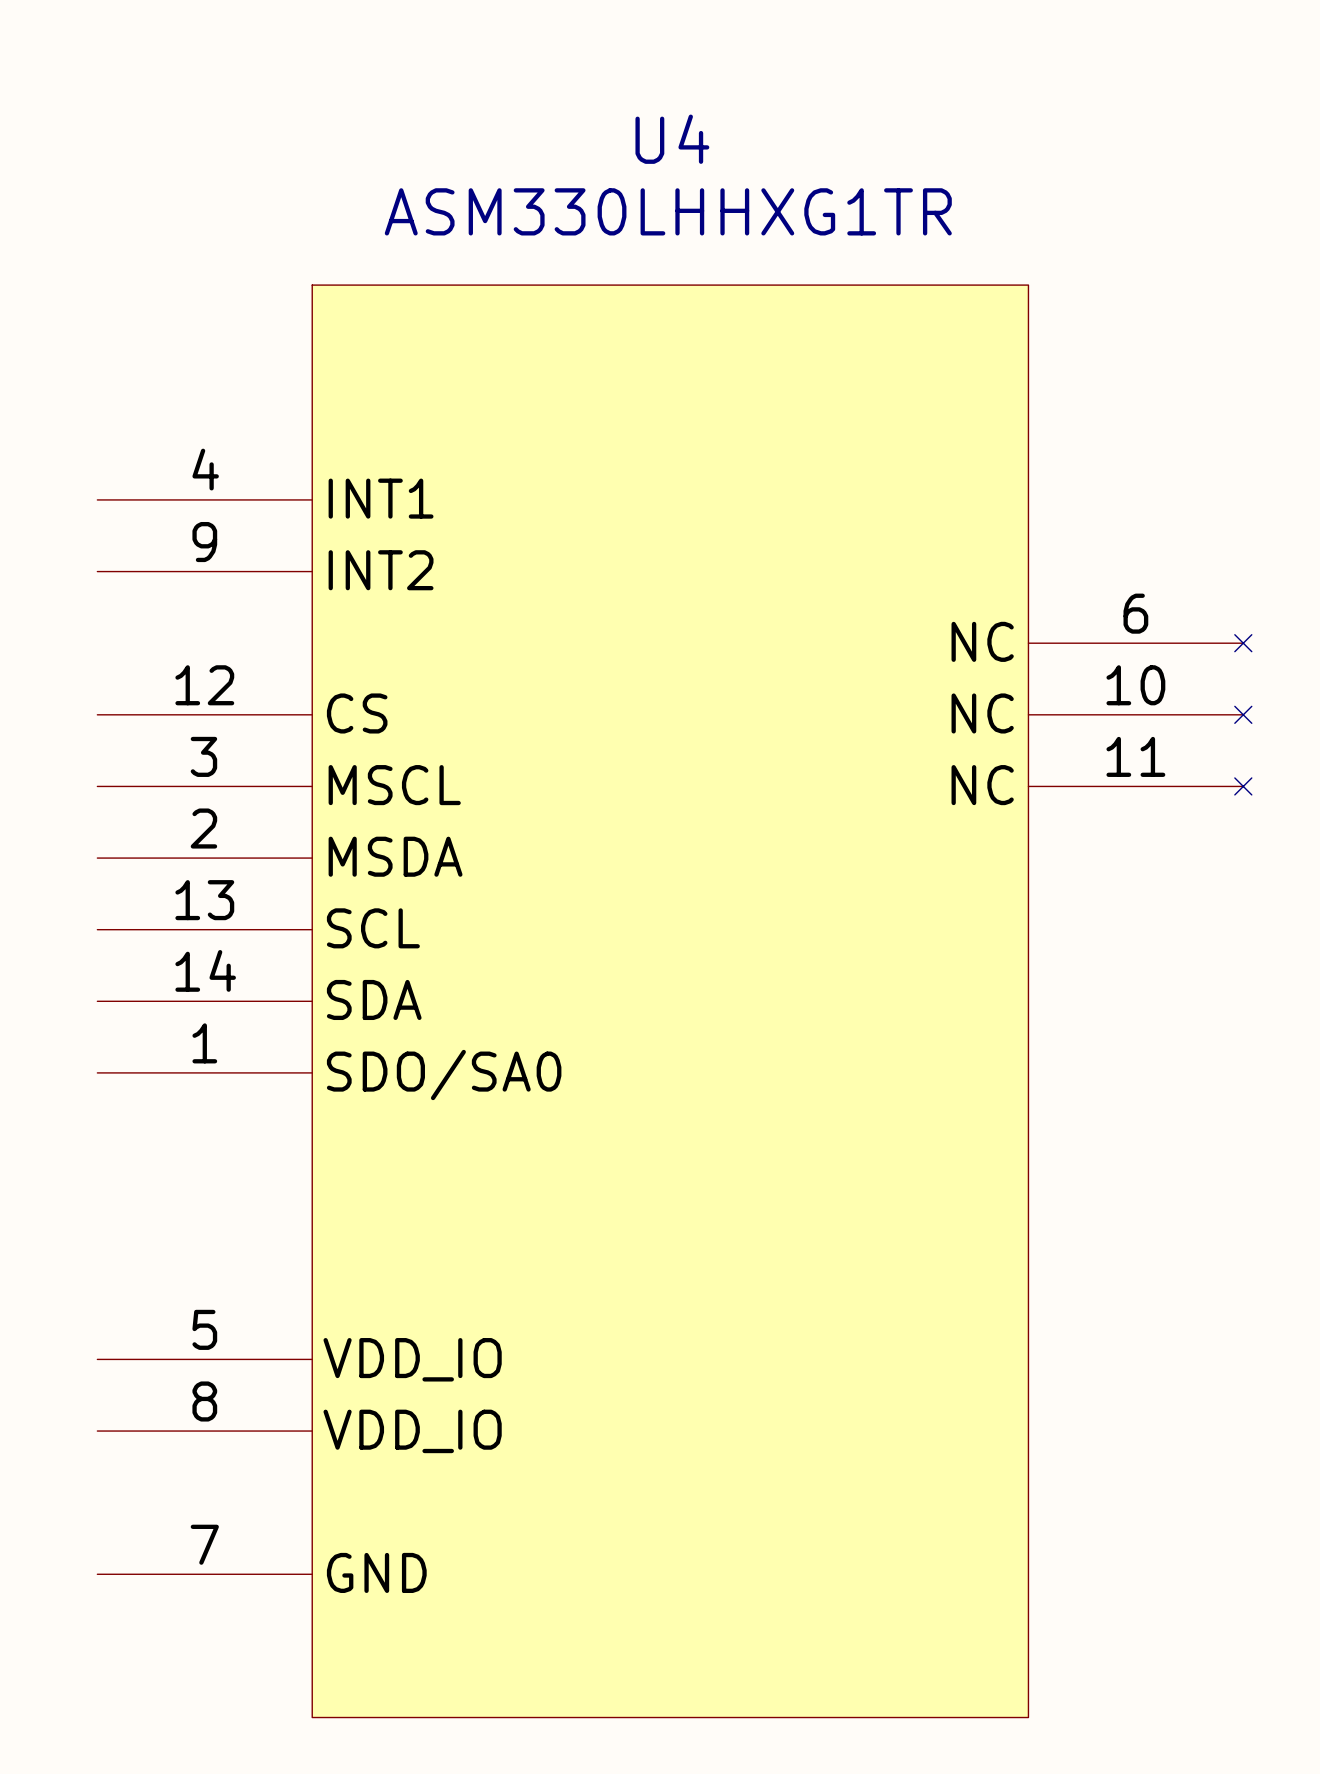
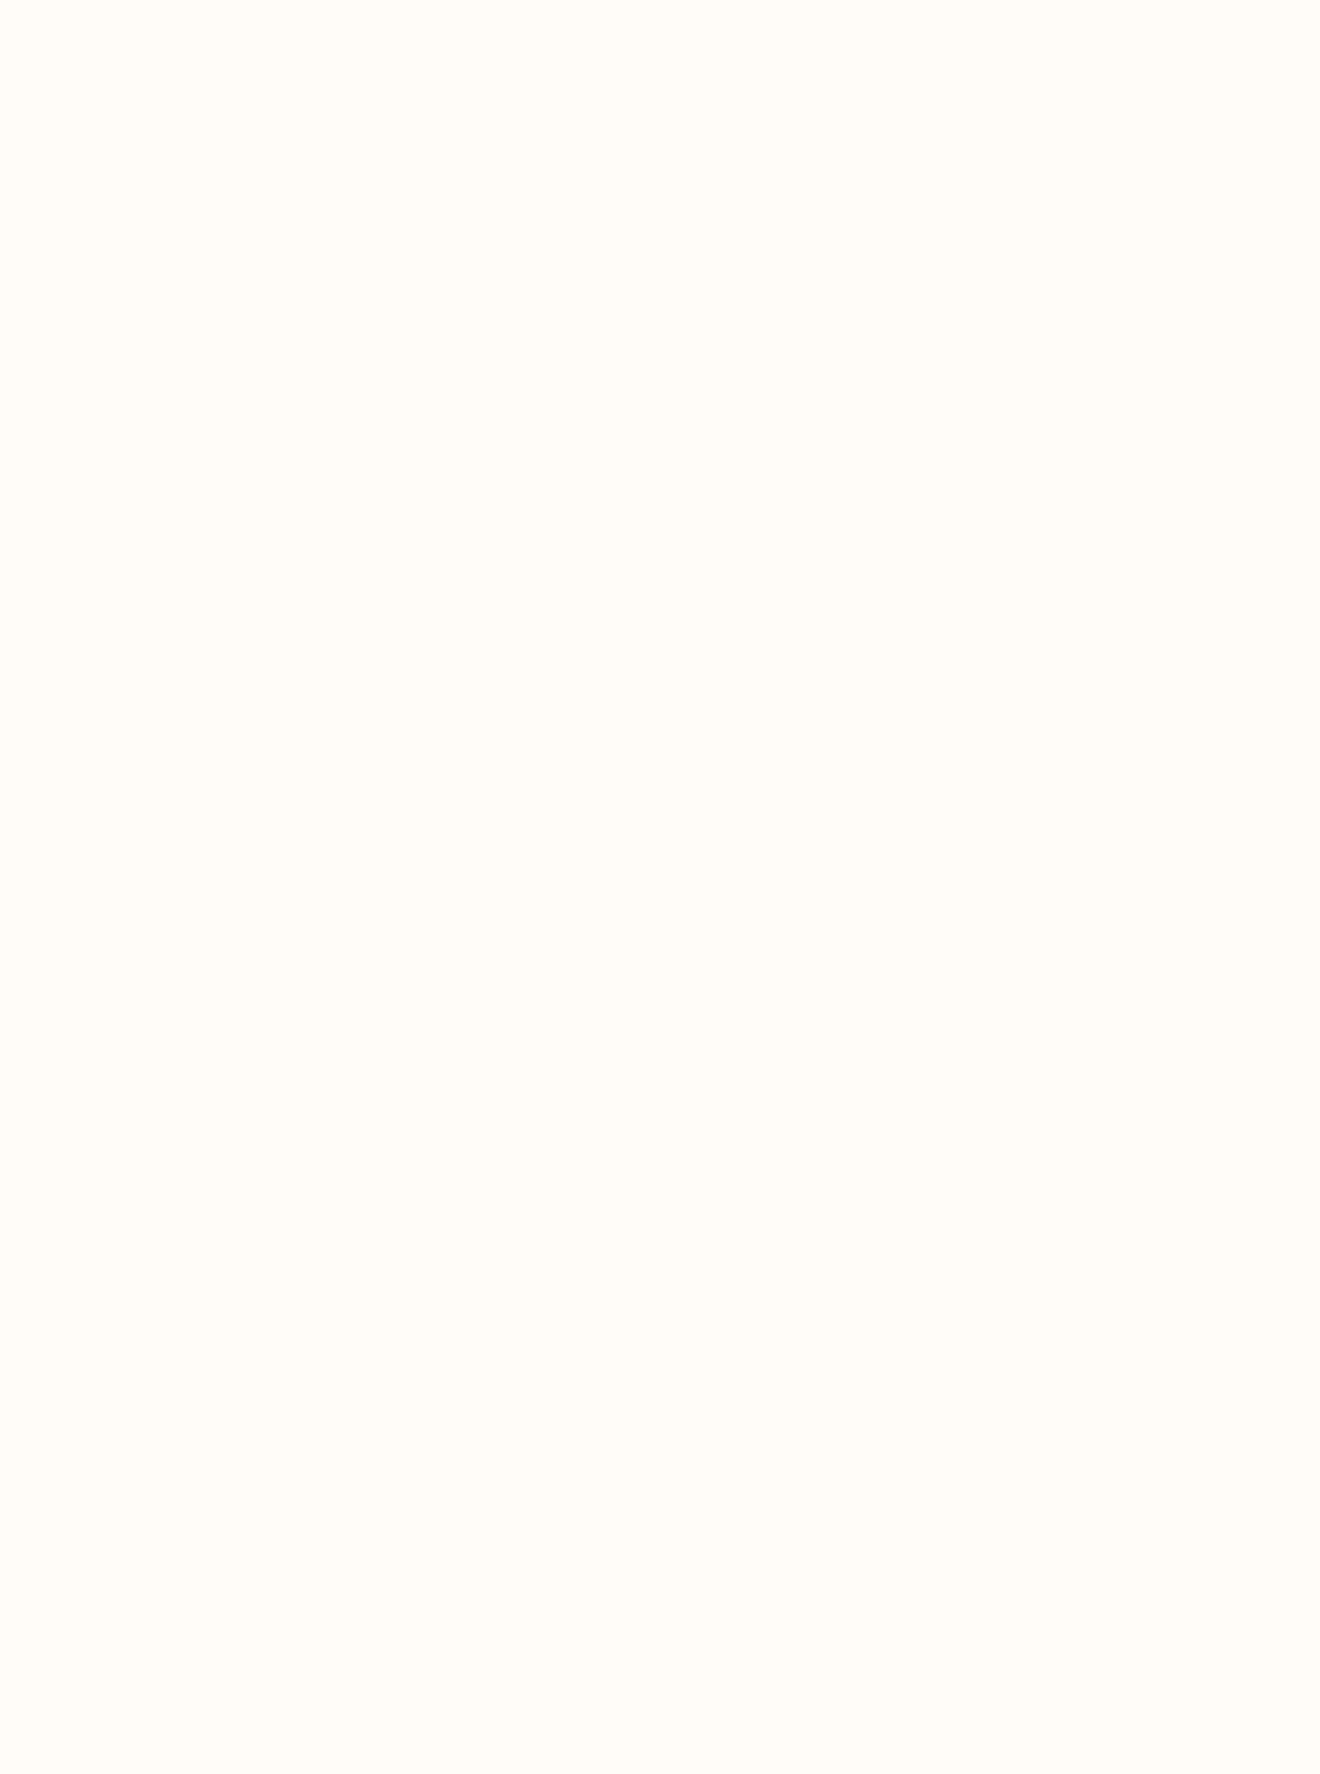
U4: ASM330LHHXG1TR (674, 1001) -> none

